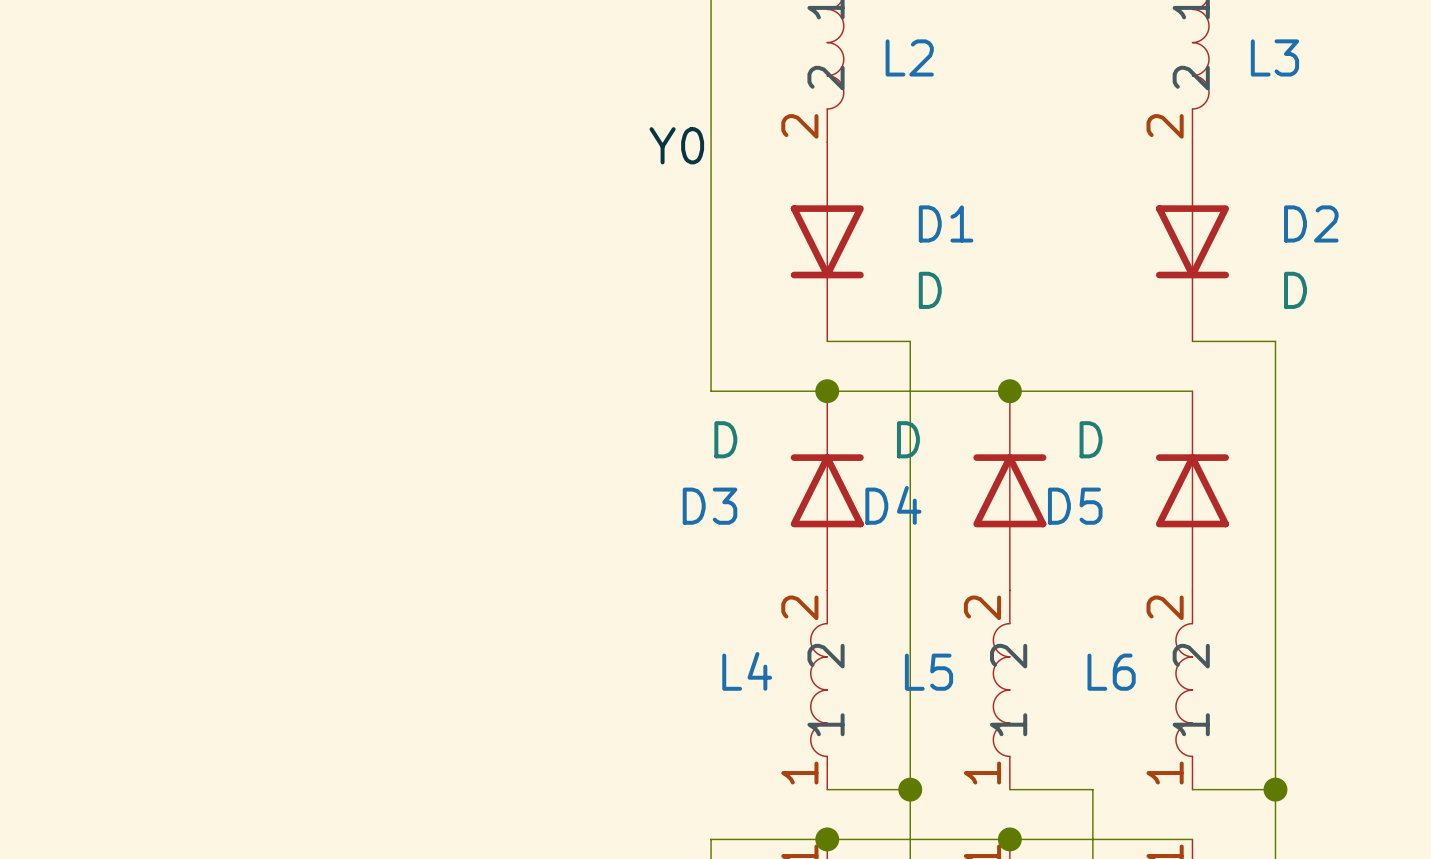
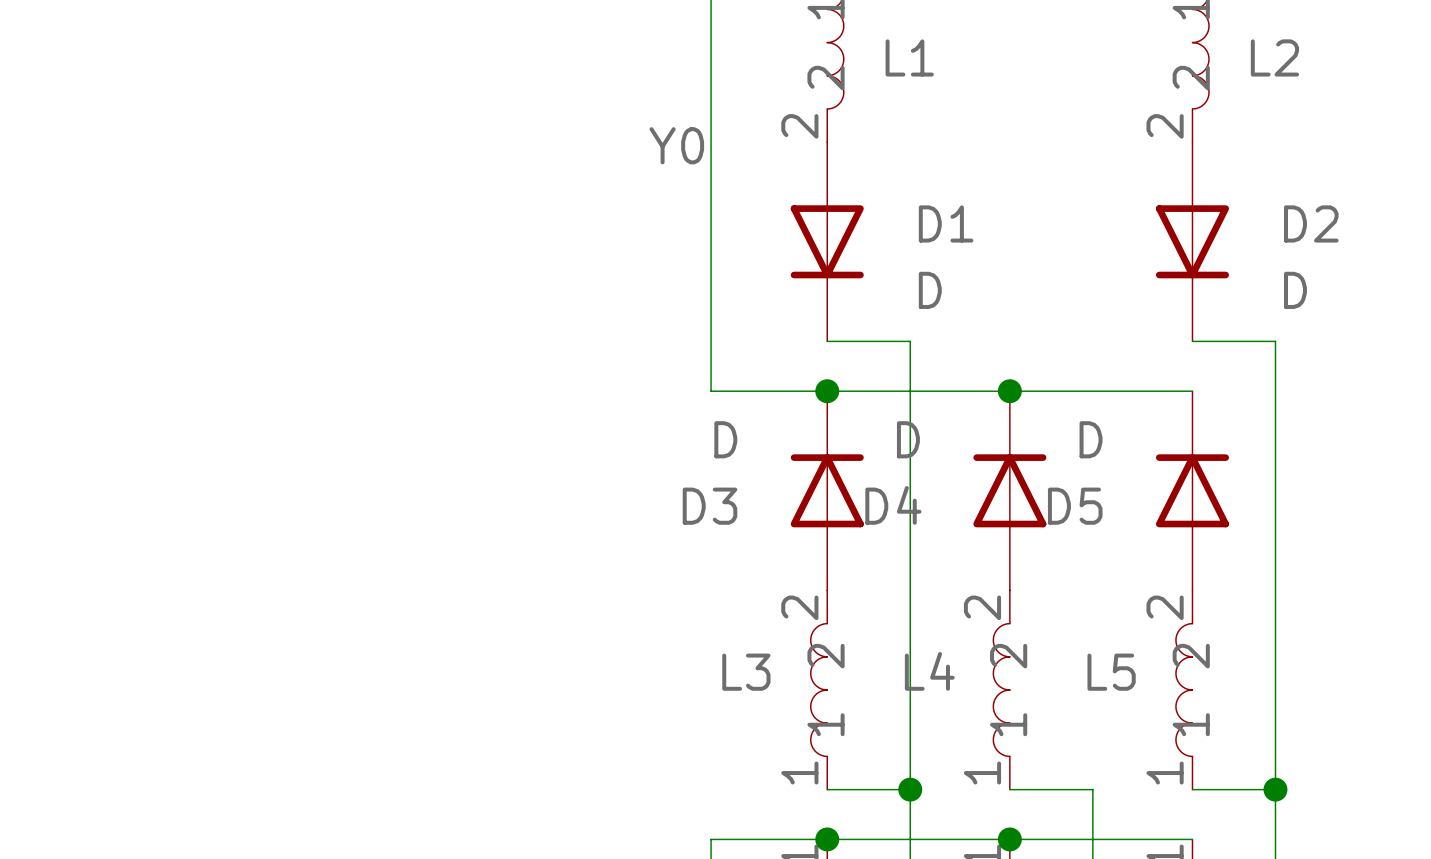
L2 name: L2 (909, 57) -> L1 (909, 57)
L3 name: L3 (1274, 57) -> L2 (1274, 57)
L4 name: L4 (747, 671) -> L3 (746, 672)
L5 name: L5 (928, 672) -> L4 (929, 671)
L6 name: L6 (1111, 672) -> L5 (1111, 672)

